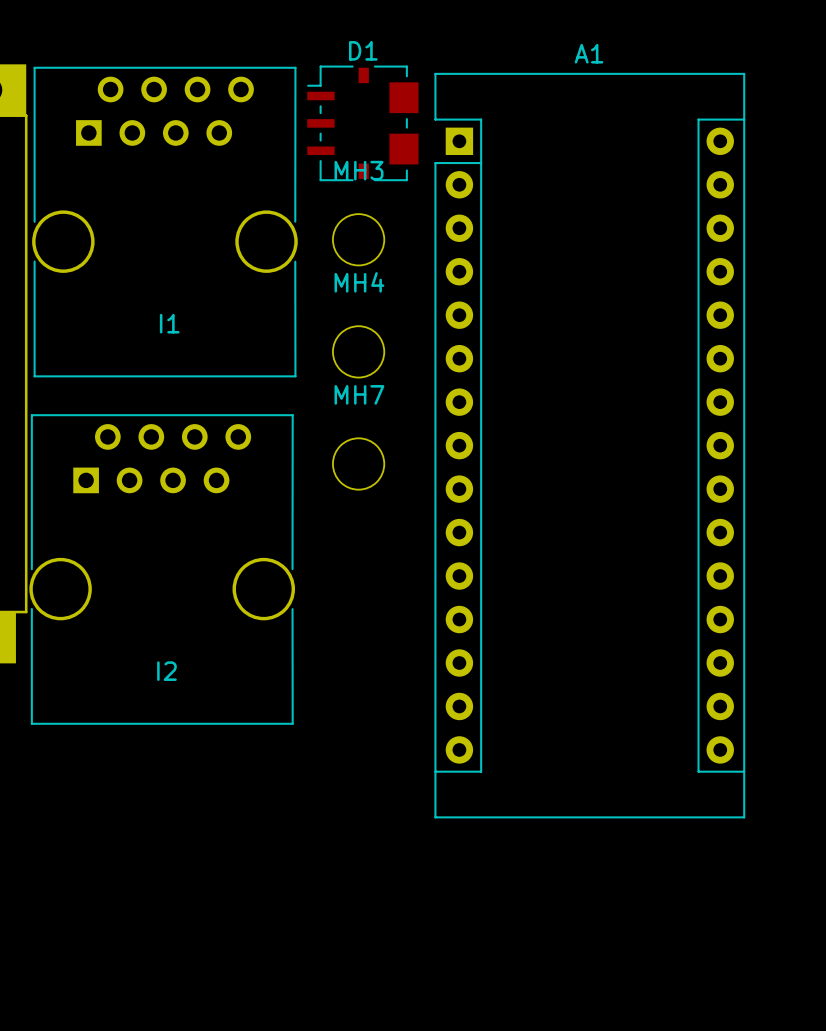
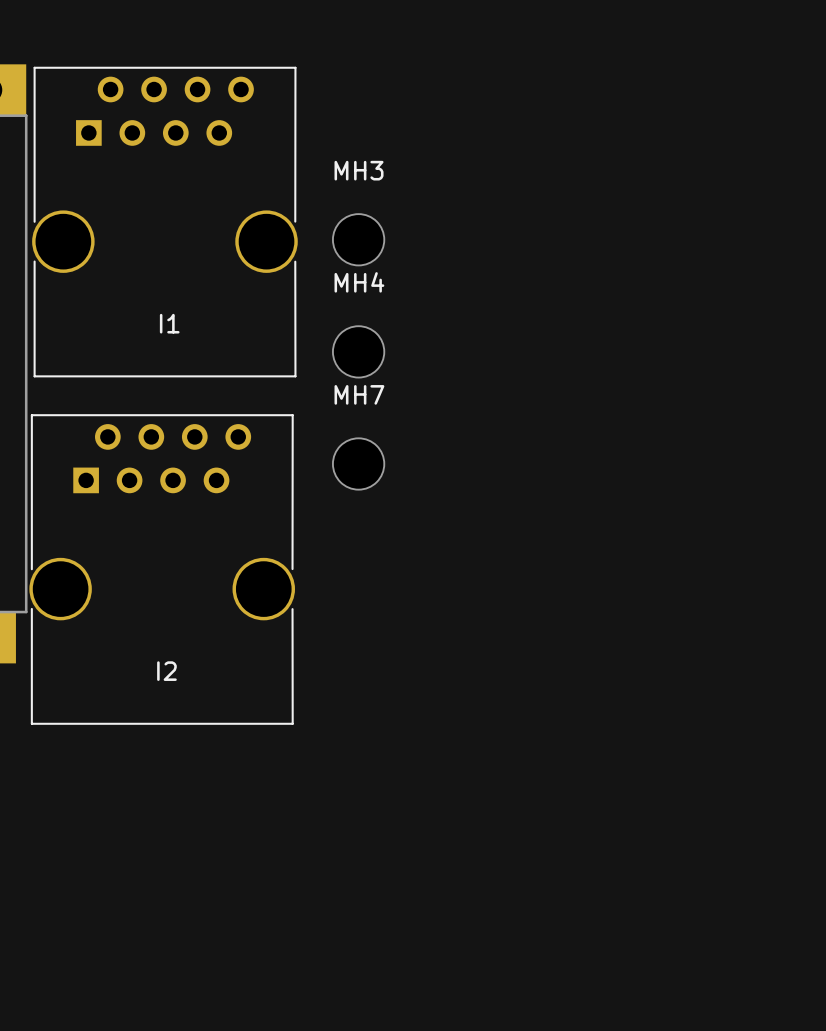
D1: (362, 123) -> none
A1: (589, 445) -> none

